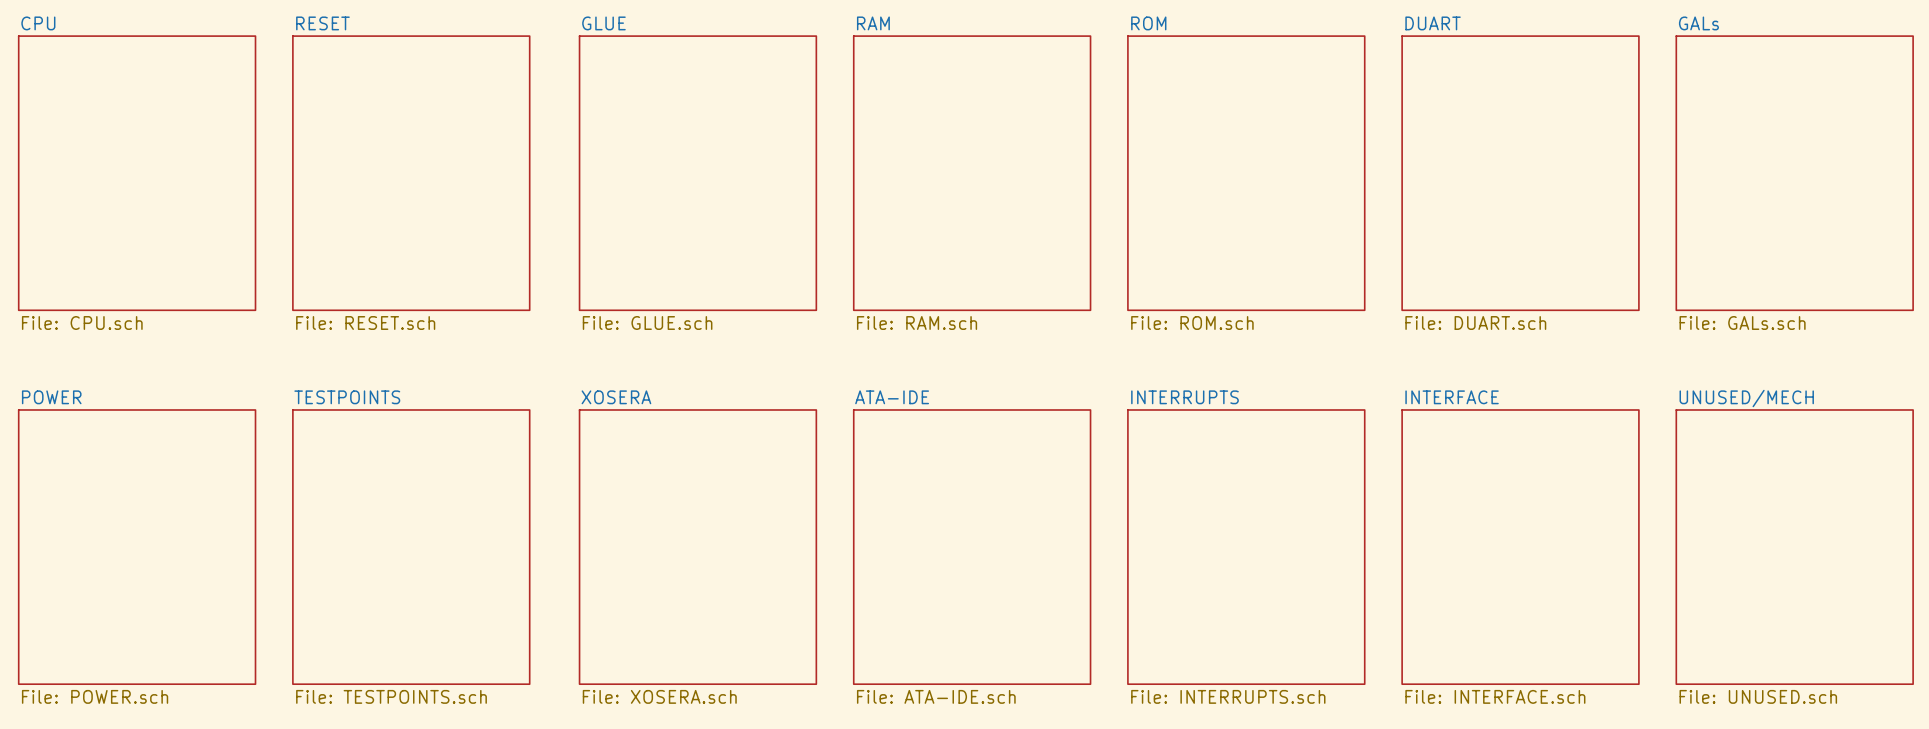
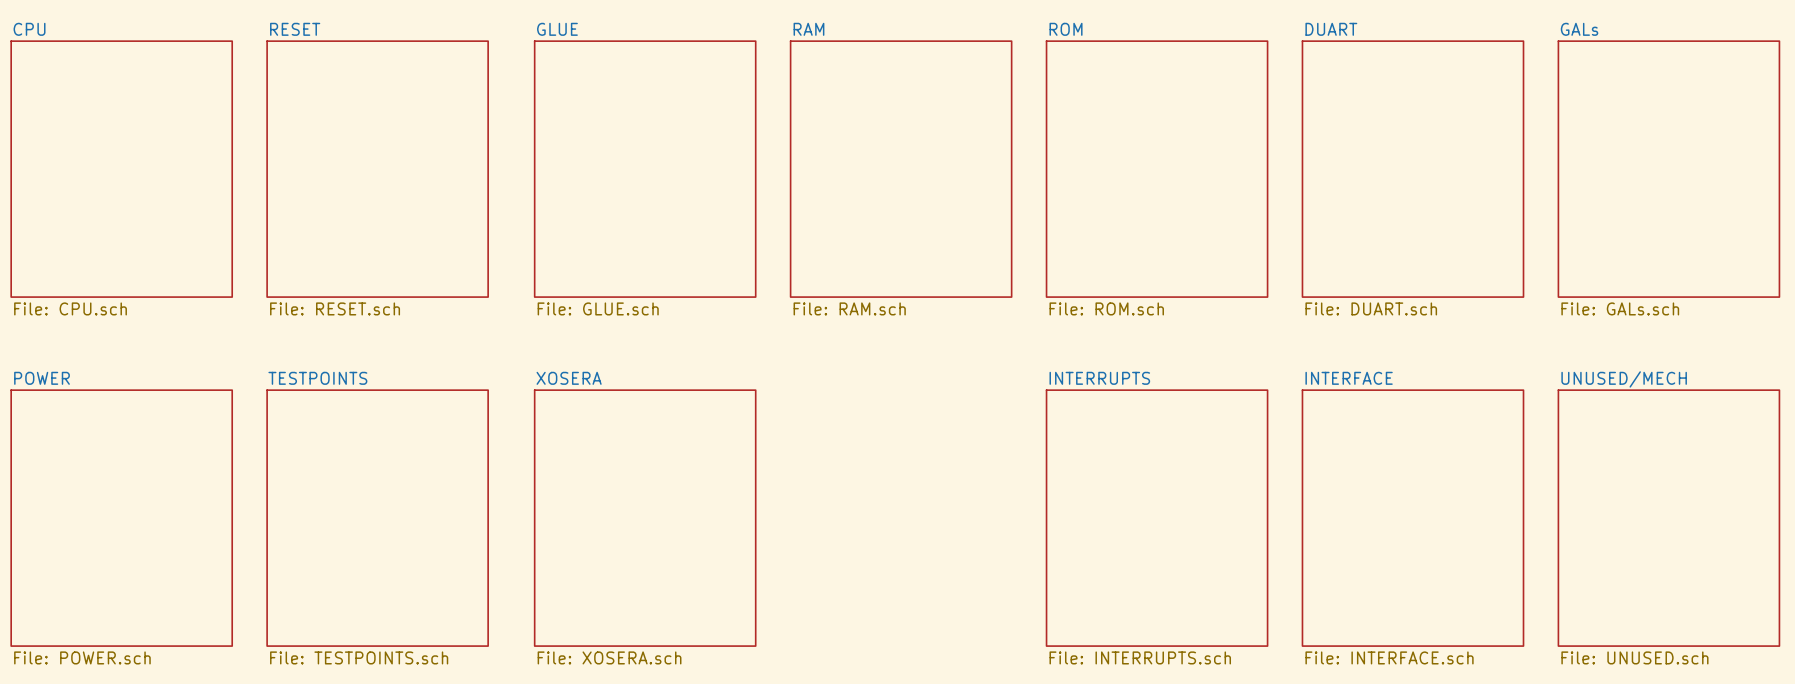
sheet ATA-IDE: File: ATA-IDE.sch (972, 547) -> none

